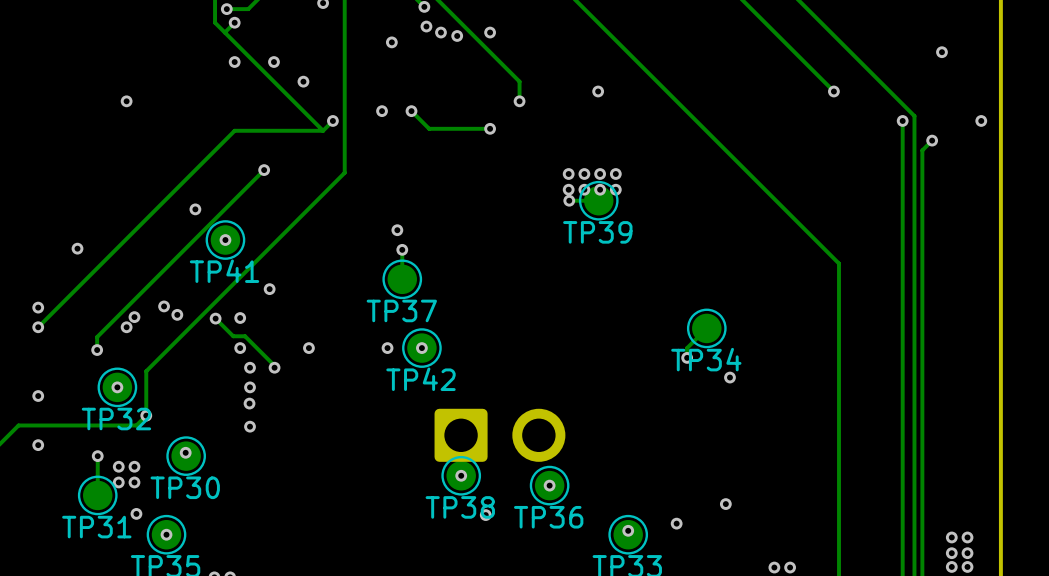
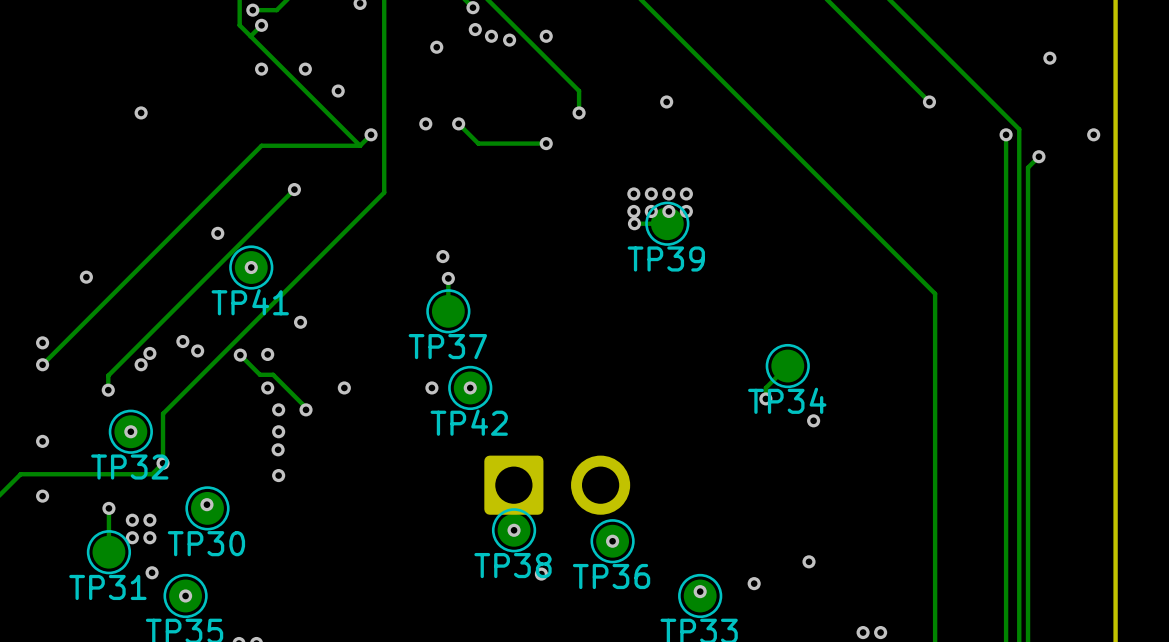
via: (951, 537) -> none
via: (967, 537) -> none
via: (951, 553) -> none
via: (967, 553) -> none
via: (951, 566) -> none
via: (967, 566) -> none

